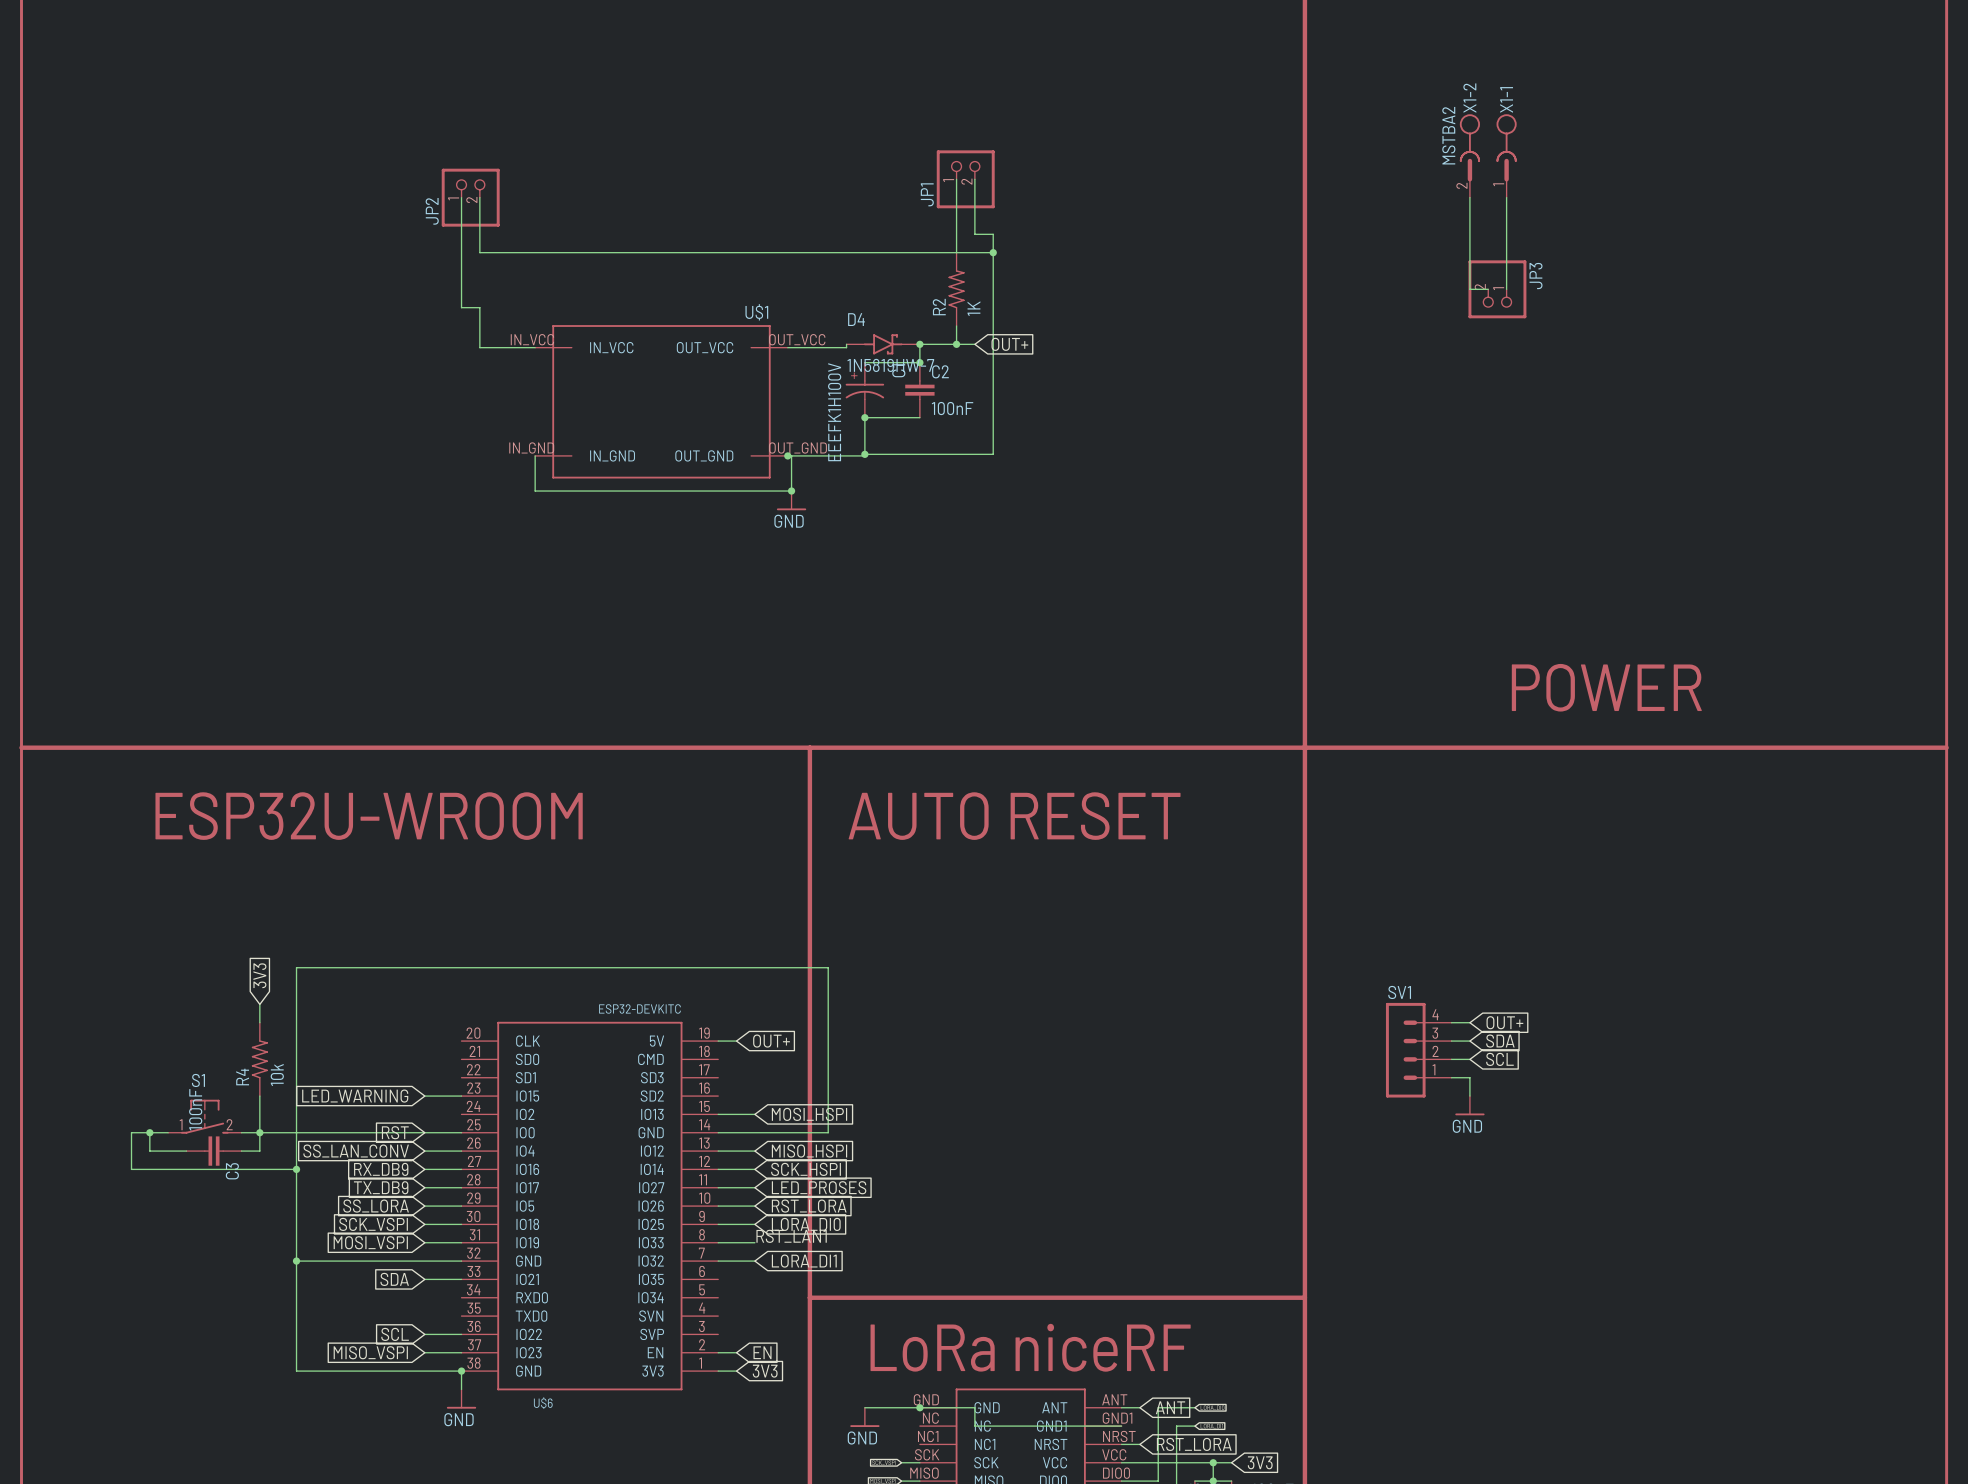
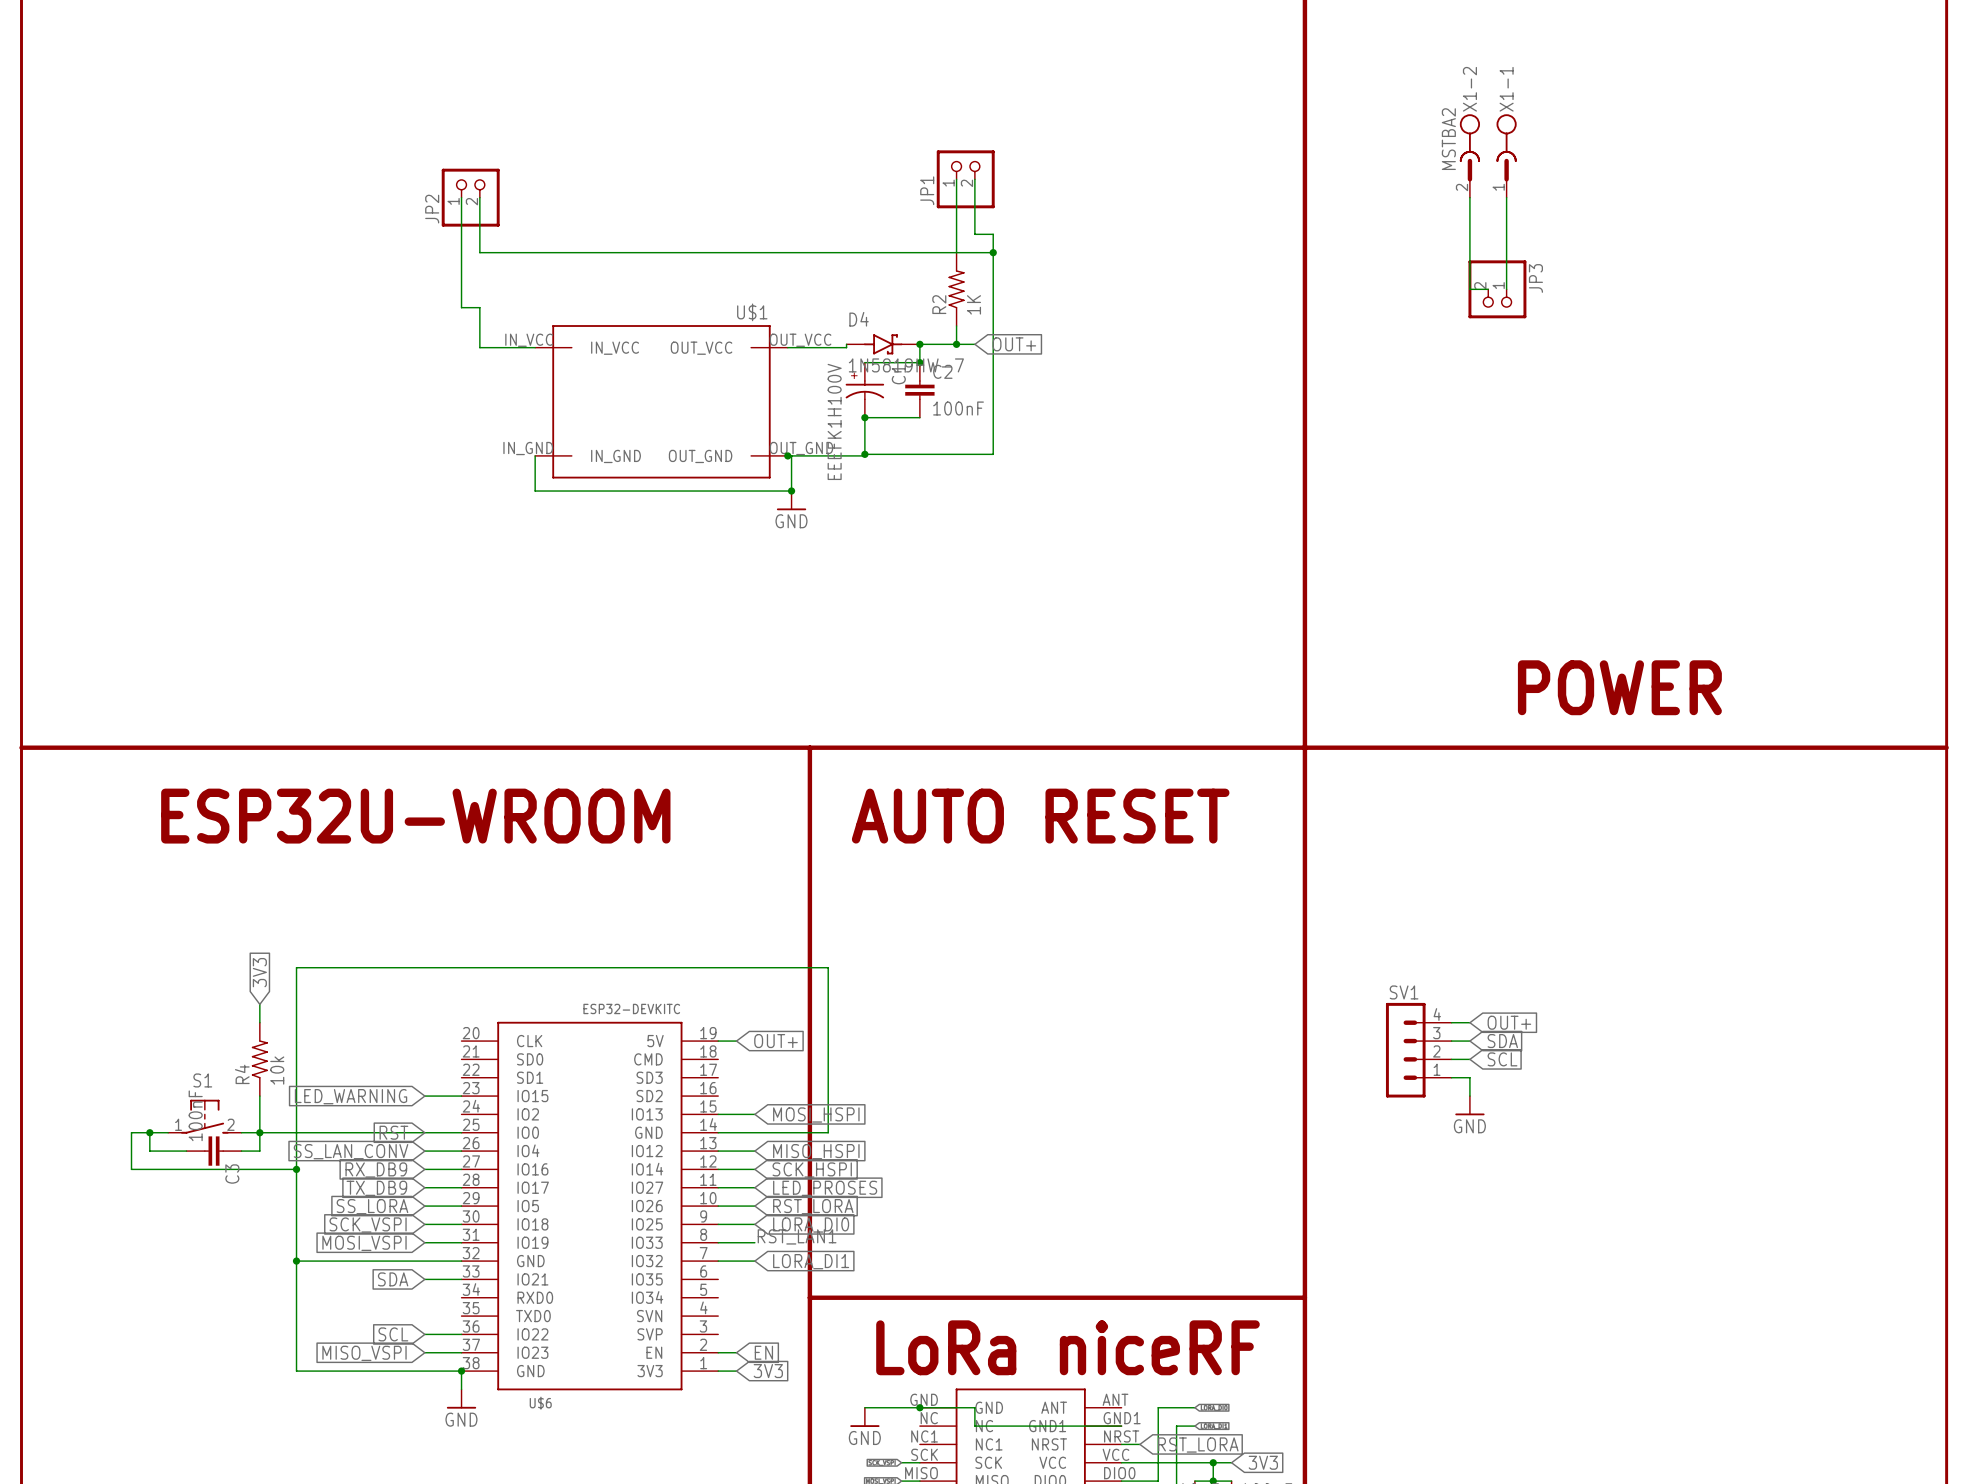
wire: (1121, 1407) (1139, 1407) -> none
global label: ANT (1170, 1407) -> none

